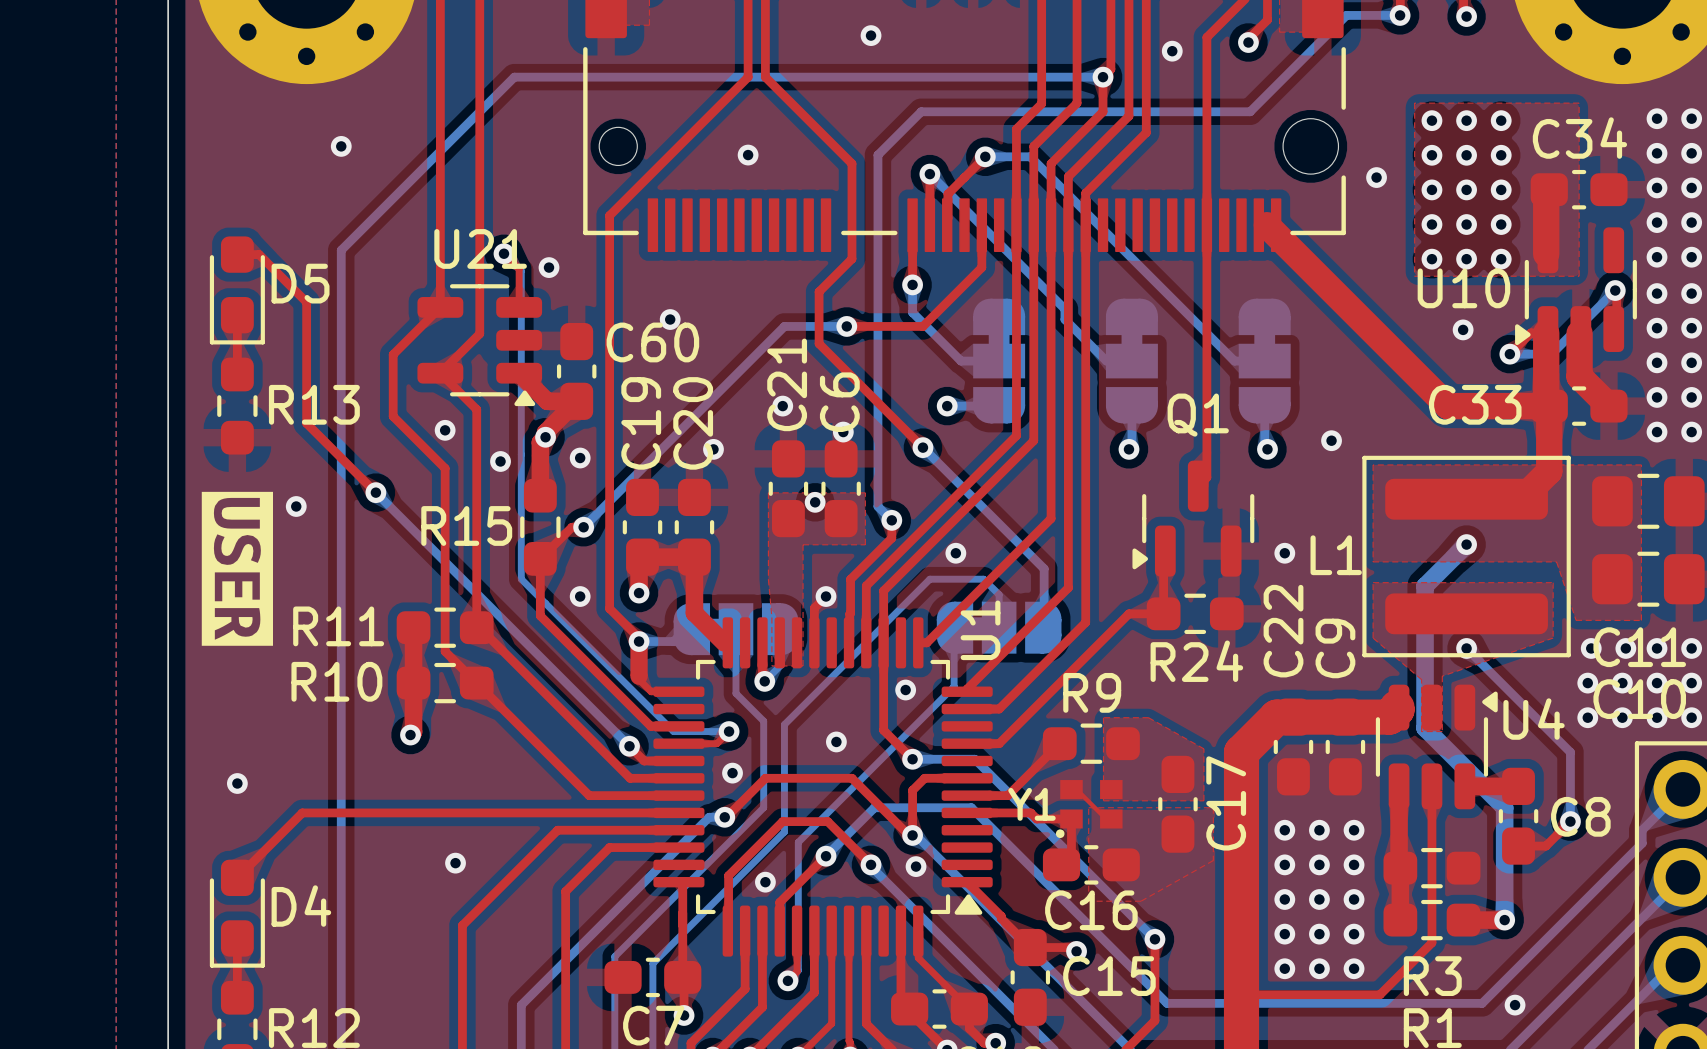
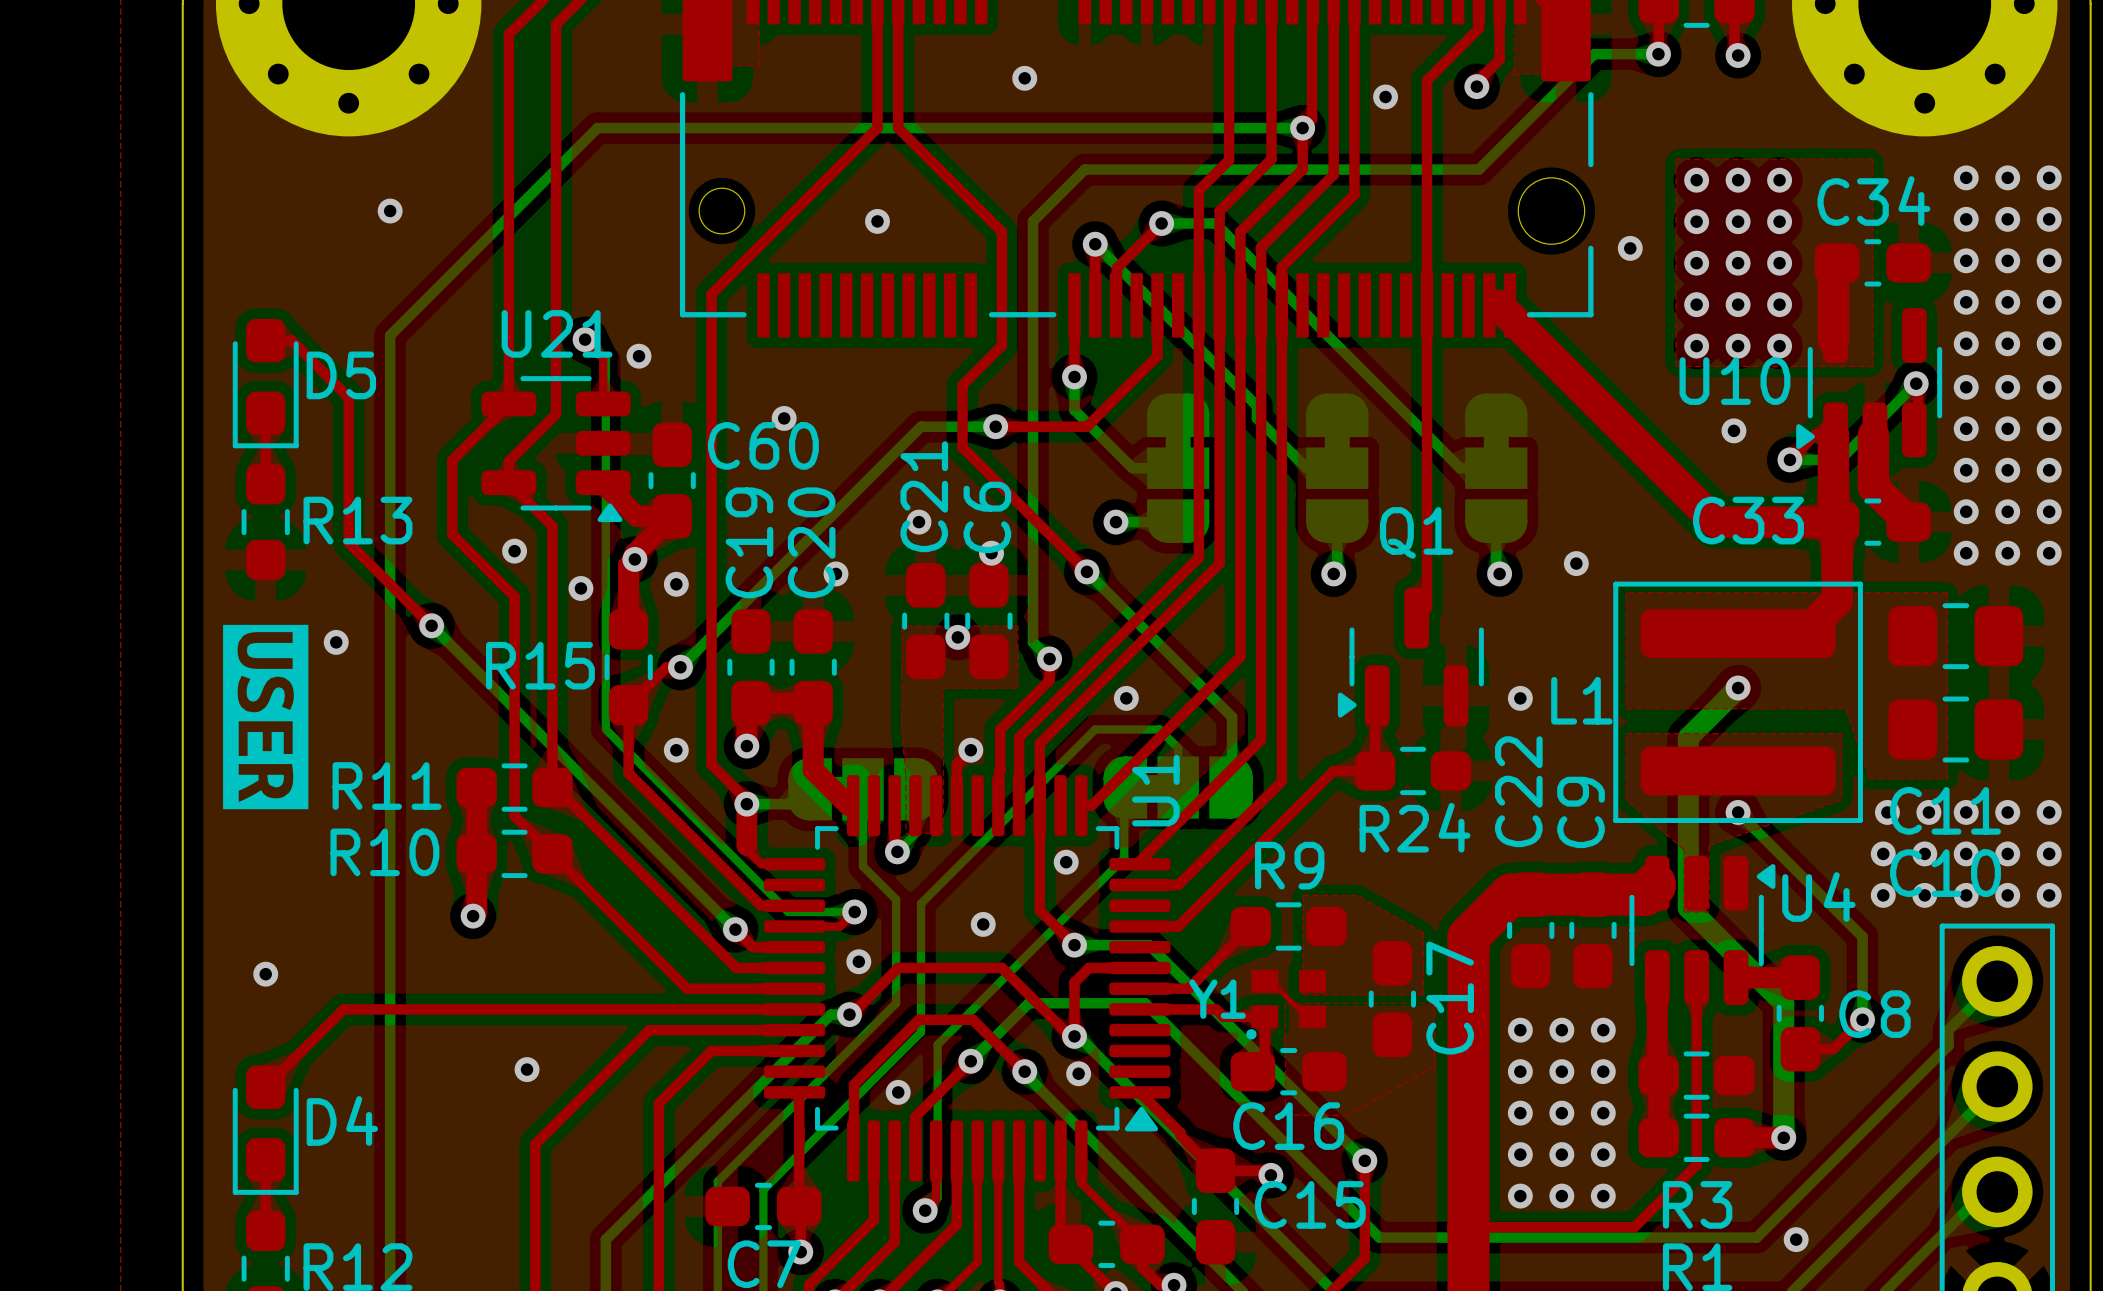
top track: (479, 316) (479, 333) (440, 373) -> (556, 414) (508, 461) (508, 482)

